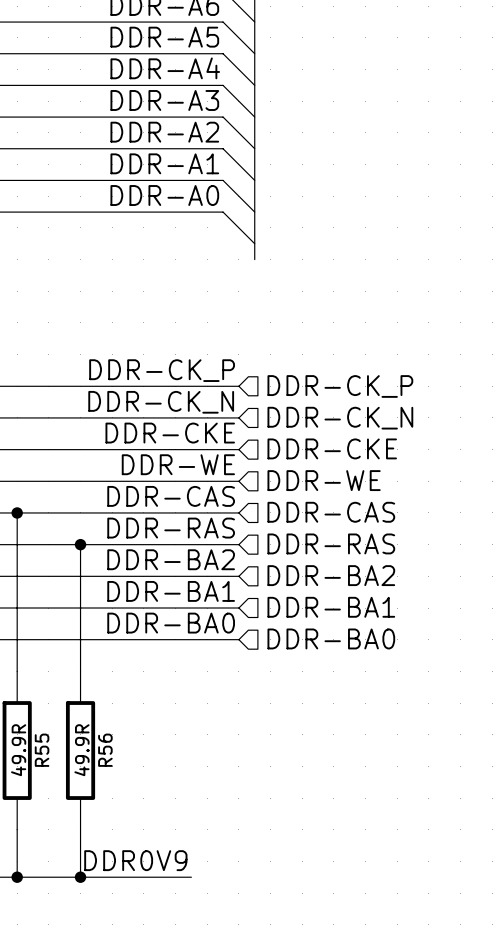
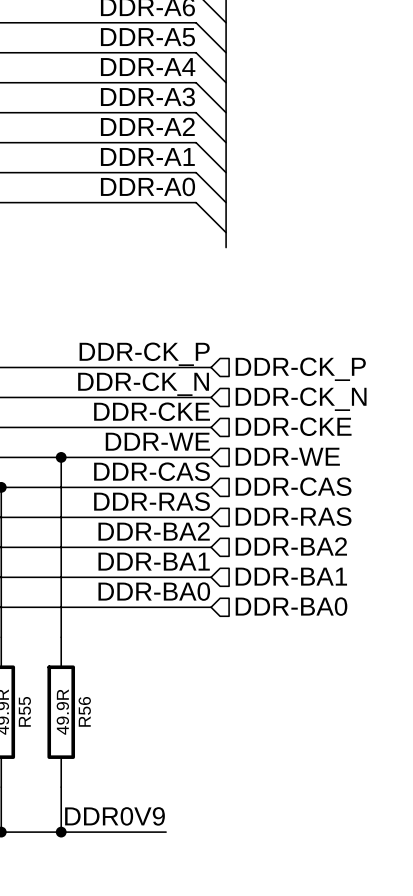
wire: none -> (61, 457) (61, 517)
junction position: (80, 544) -> (61, 457)

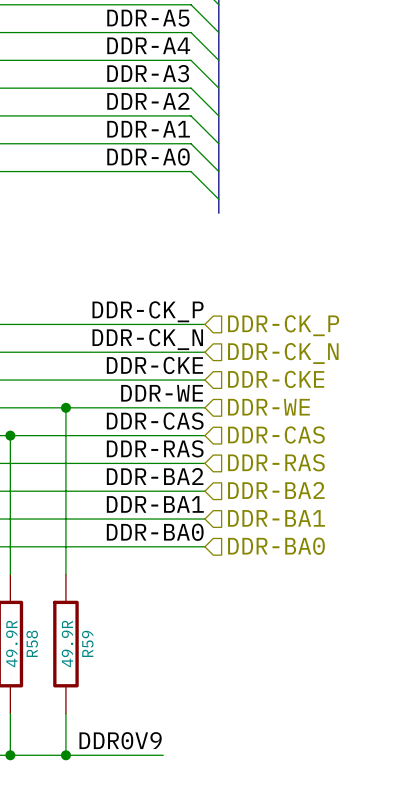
R55 name: R55 (24, 711) -> R58 (32, 643)
R56 name: R56 (84, 711) -> R59 (87, 643)

